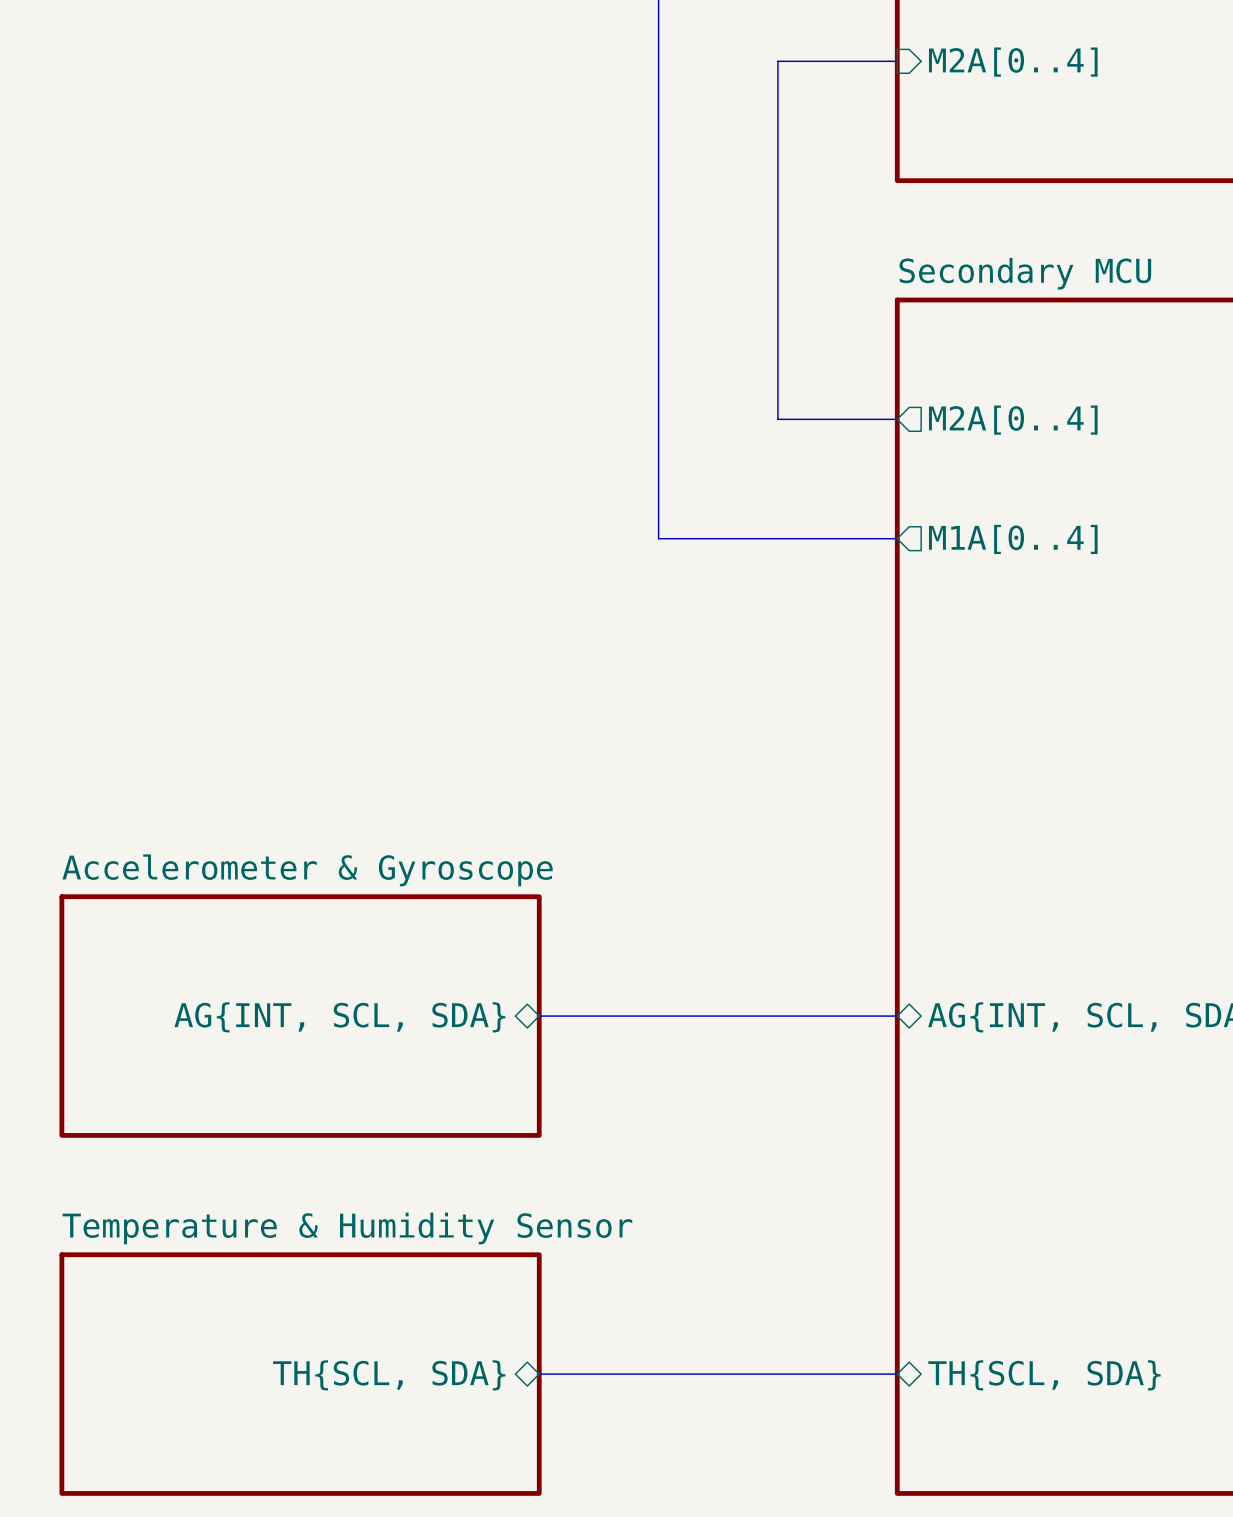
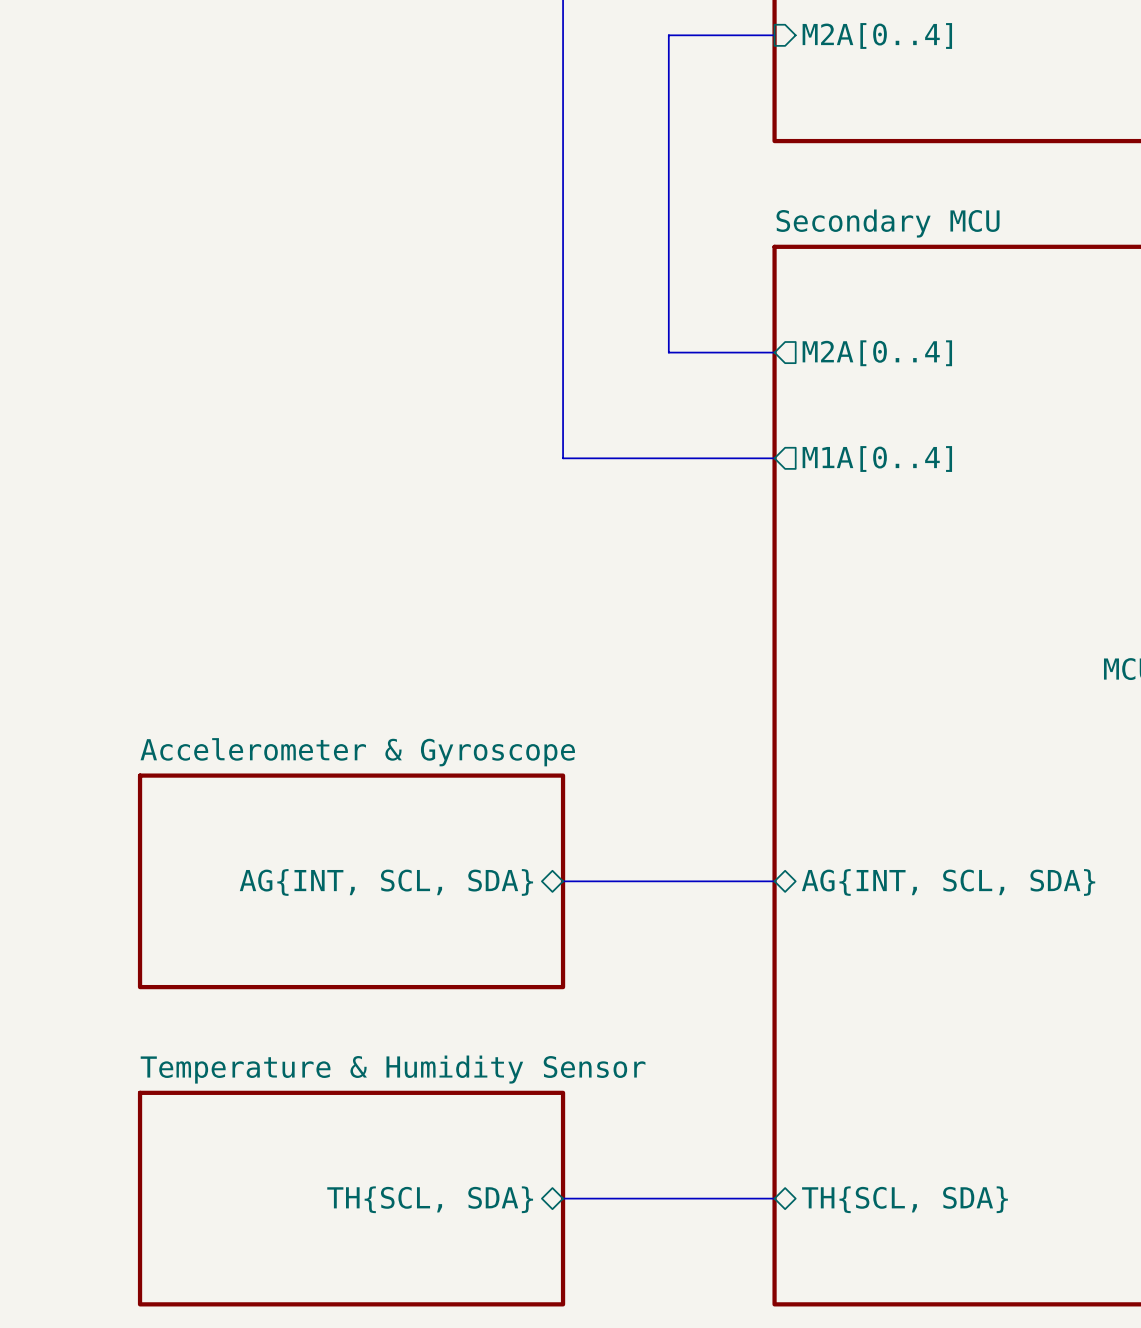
sheet Accelerometer & Gyroscope position: (300, 1016) -> (351, 881)
bus: (539, 1016) (658, 1016) -> none
sheet pin position: AG{INT, SCL, SDA} (339, 1017) -> AG{INT, SCL, SDA} (386, 882)
sheet Temperature & Humidity Sensor position: (300, 1374) -> (351, 1198)
bus: (539, 1374) (658, 1374) -> none
sheet pin position: TH{SCL, SDA} (389, 1375) -> TH{SCL, SDA} (430, 1199)

